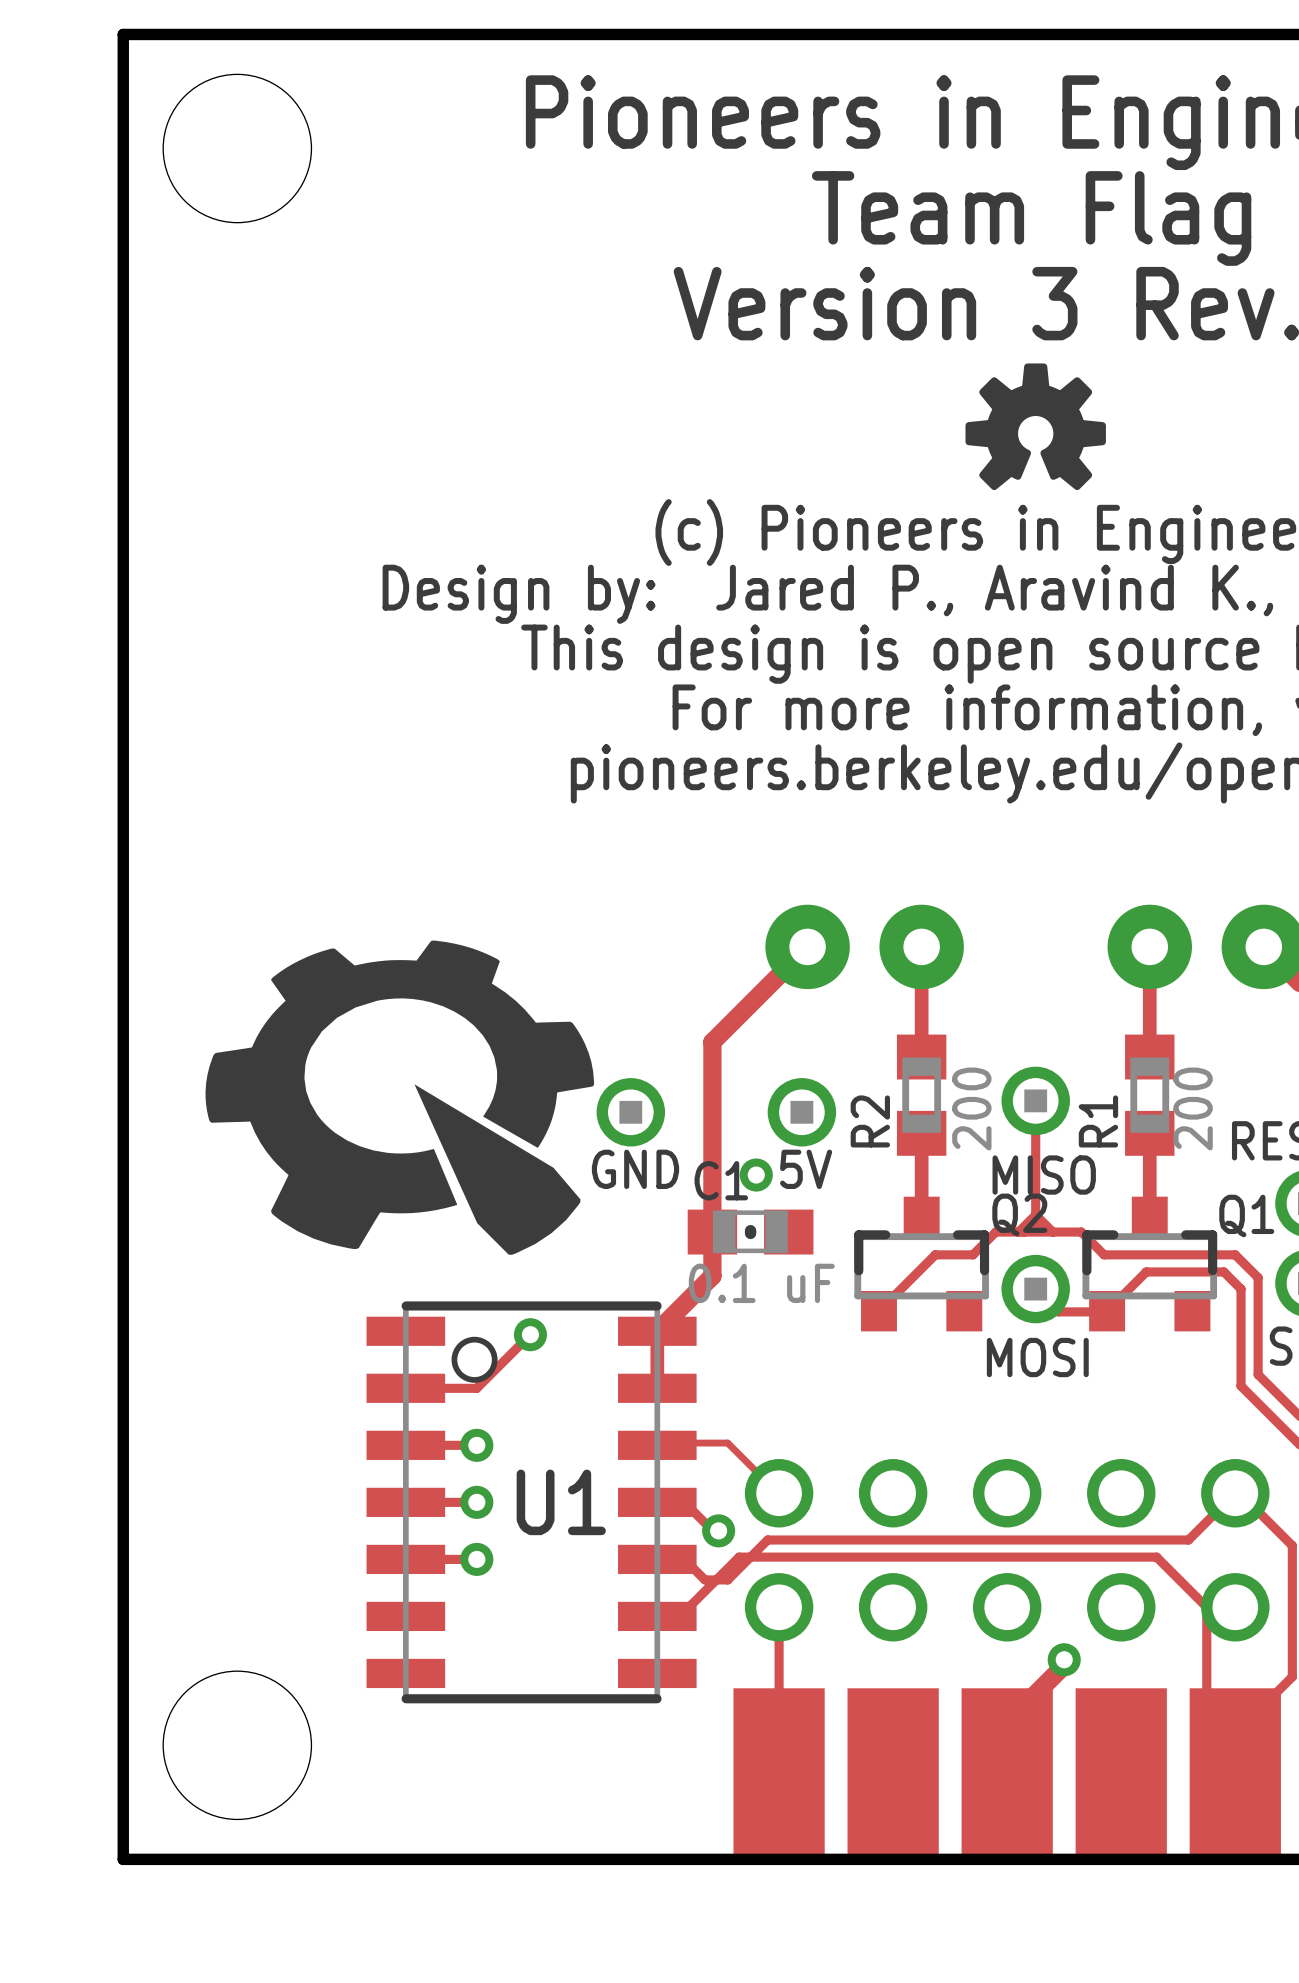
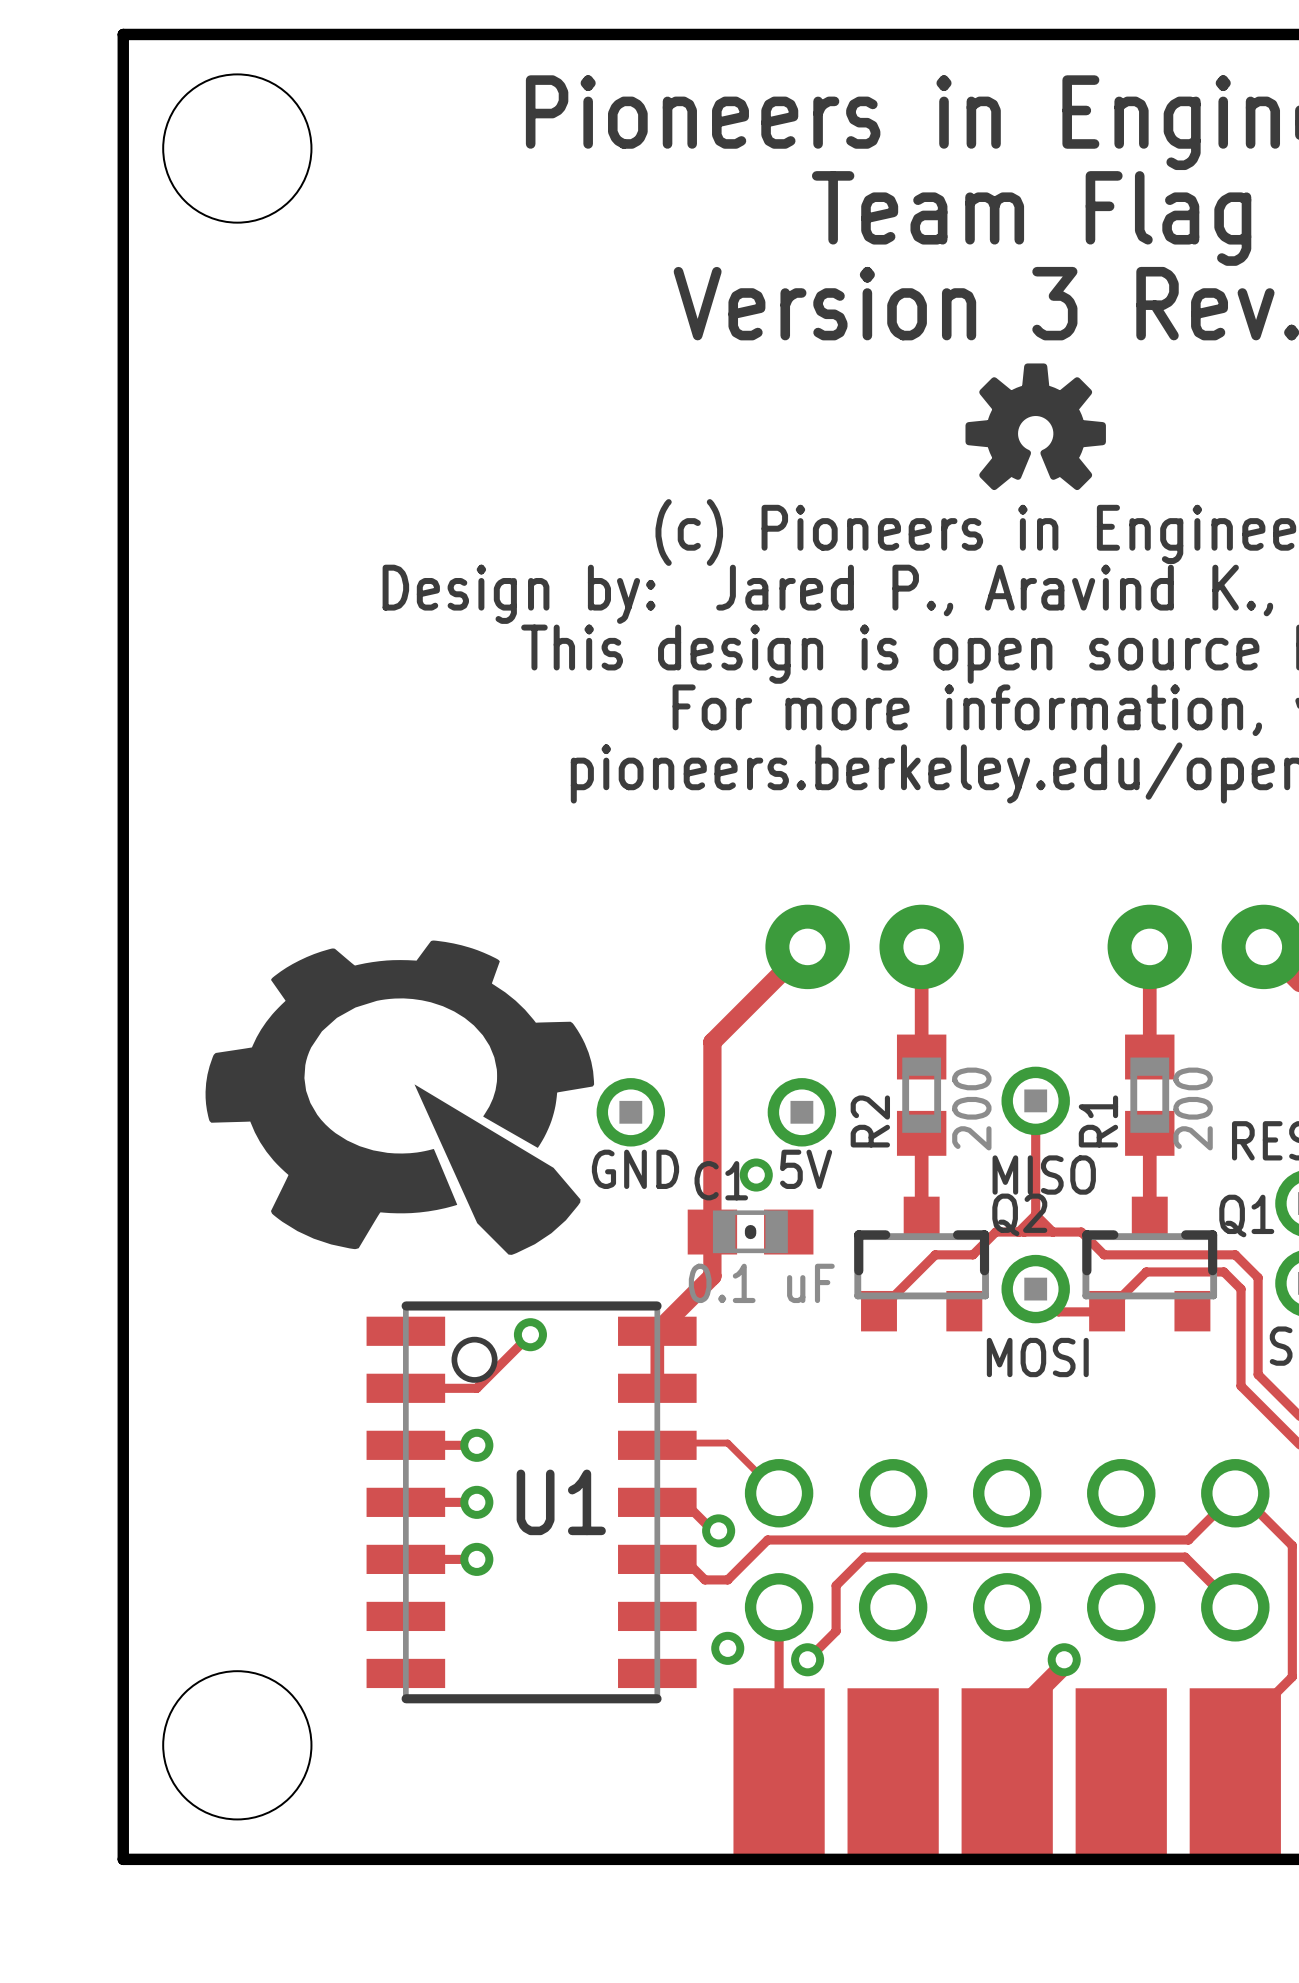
track: (864, 1557) (739, 1557) (679, 1616) (657, 1616) -> (864, 1557) (836, 1585) (836, 1631) (807, 1659)
track: (1156, 1557) (1206, 1607) (1206, 1773) -> (1156, 1557) (1185, 1557) (1235, 1607)
via: none -> (727, 1648)
via: none -> (807, 1659)

